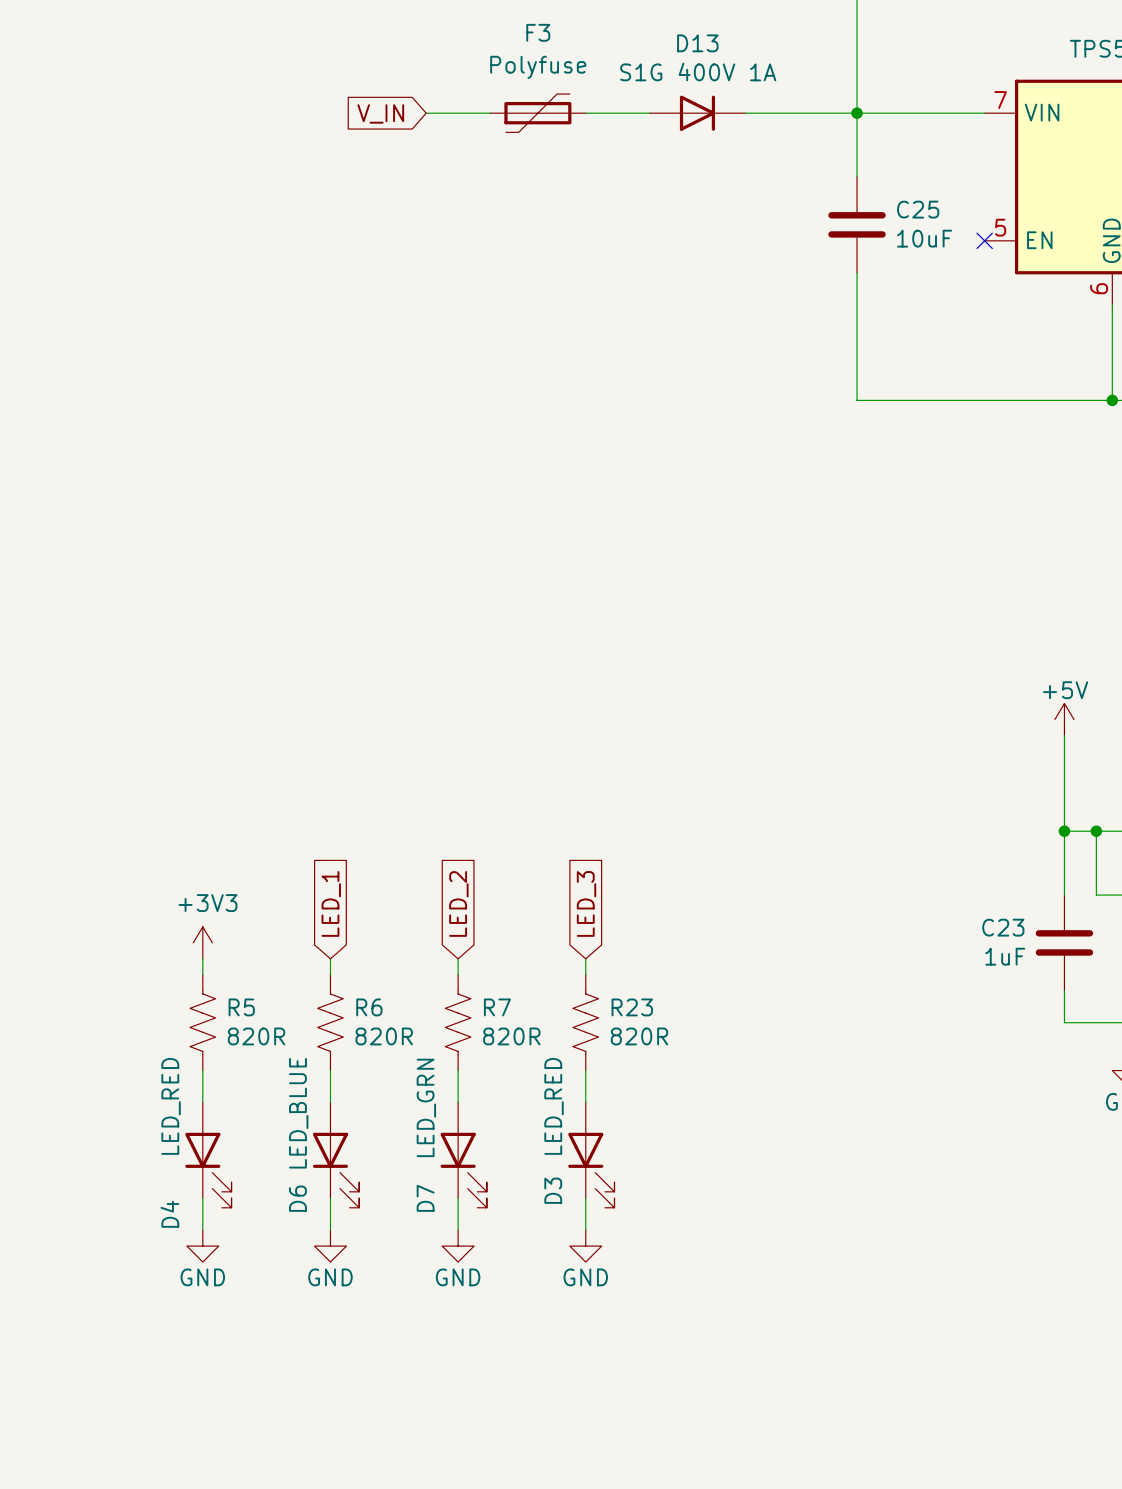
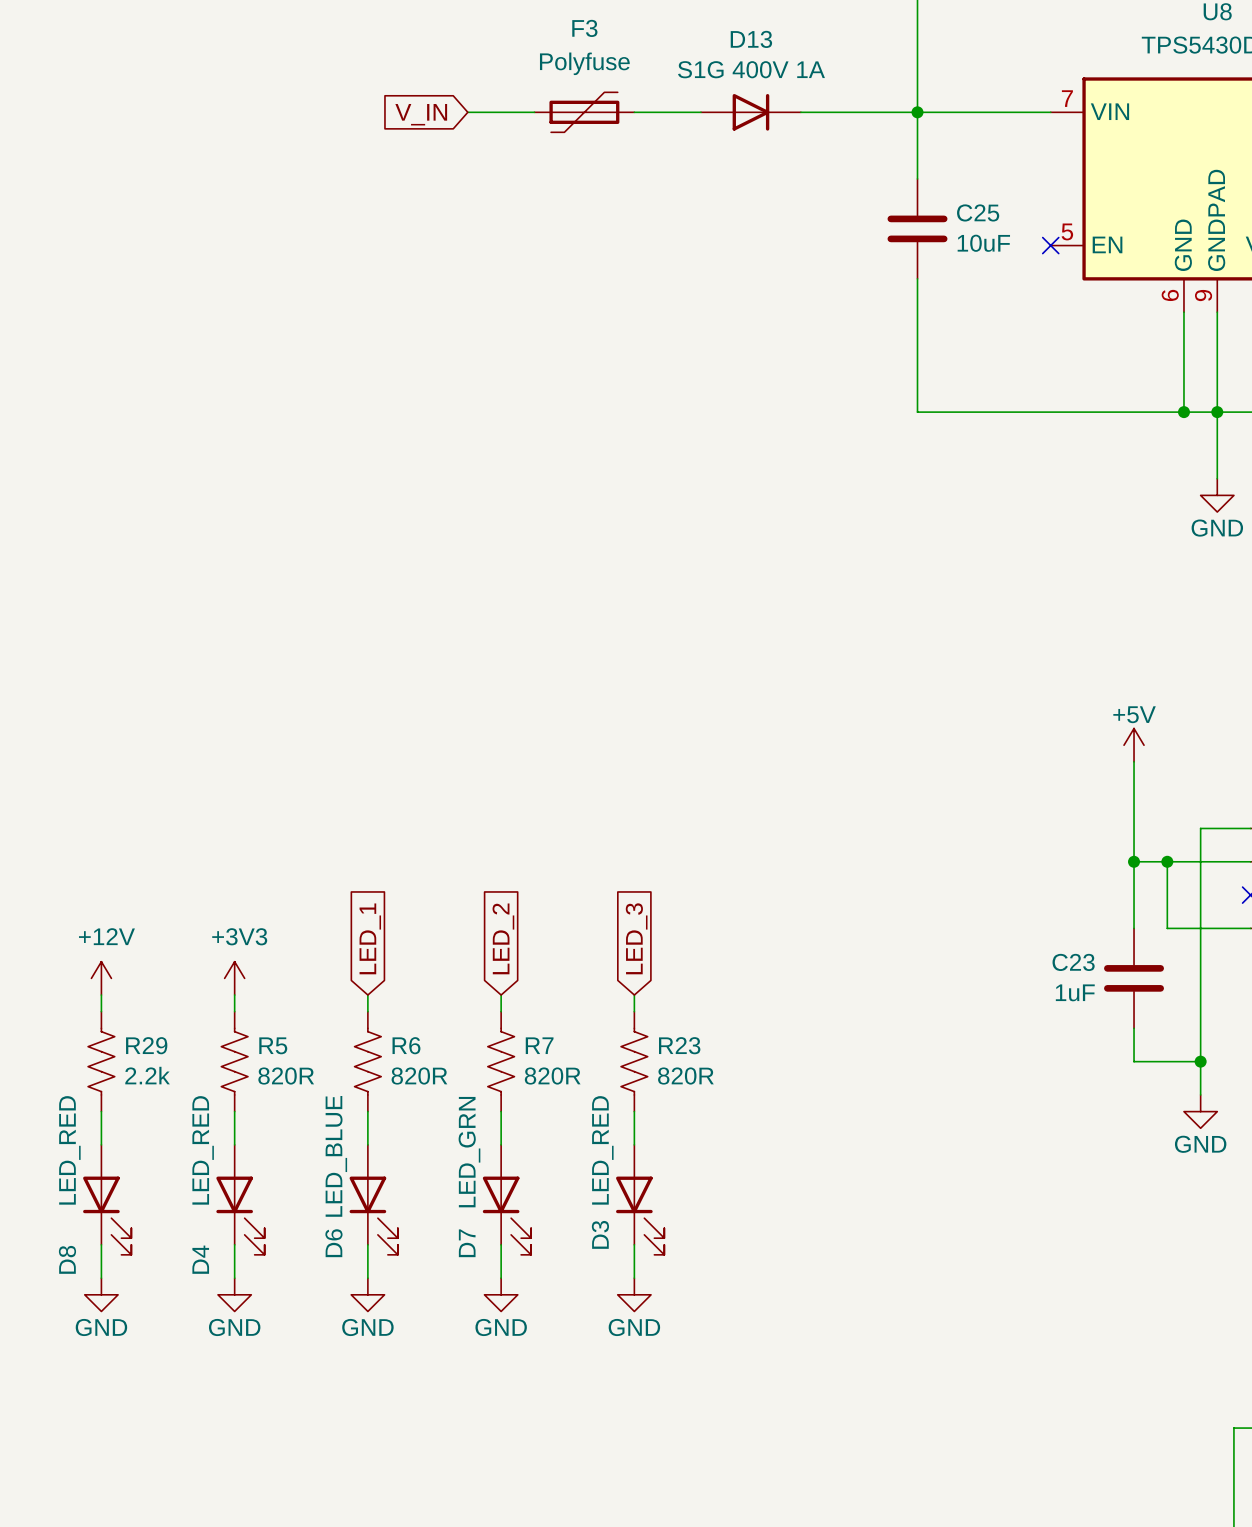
power symbol: none -> +12V (101, 978)
wire: none -> (101, 995) (101, 1011)
R29: none -> 2.2k (101, 1061)
wire: none -> (101, 1111) (101, 1144)
D8: none -> LED_RED (107, 1199)
wire: none -> (101, 1244) (101, 1278)
power symbol: none -> GND (101, 1294)

